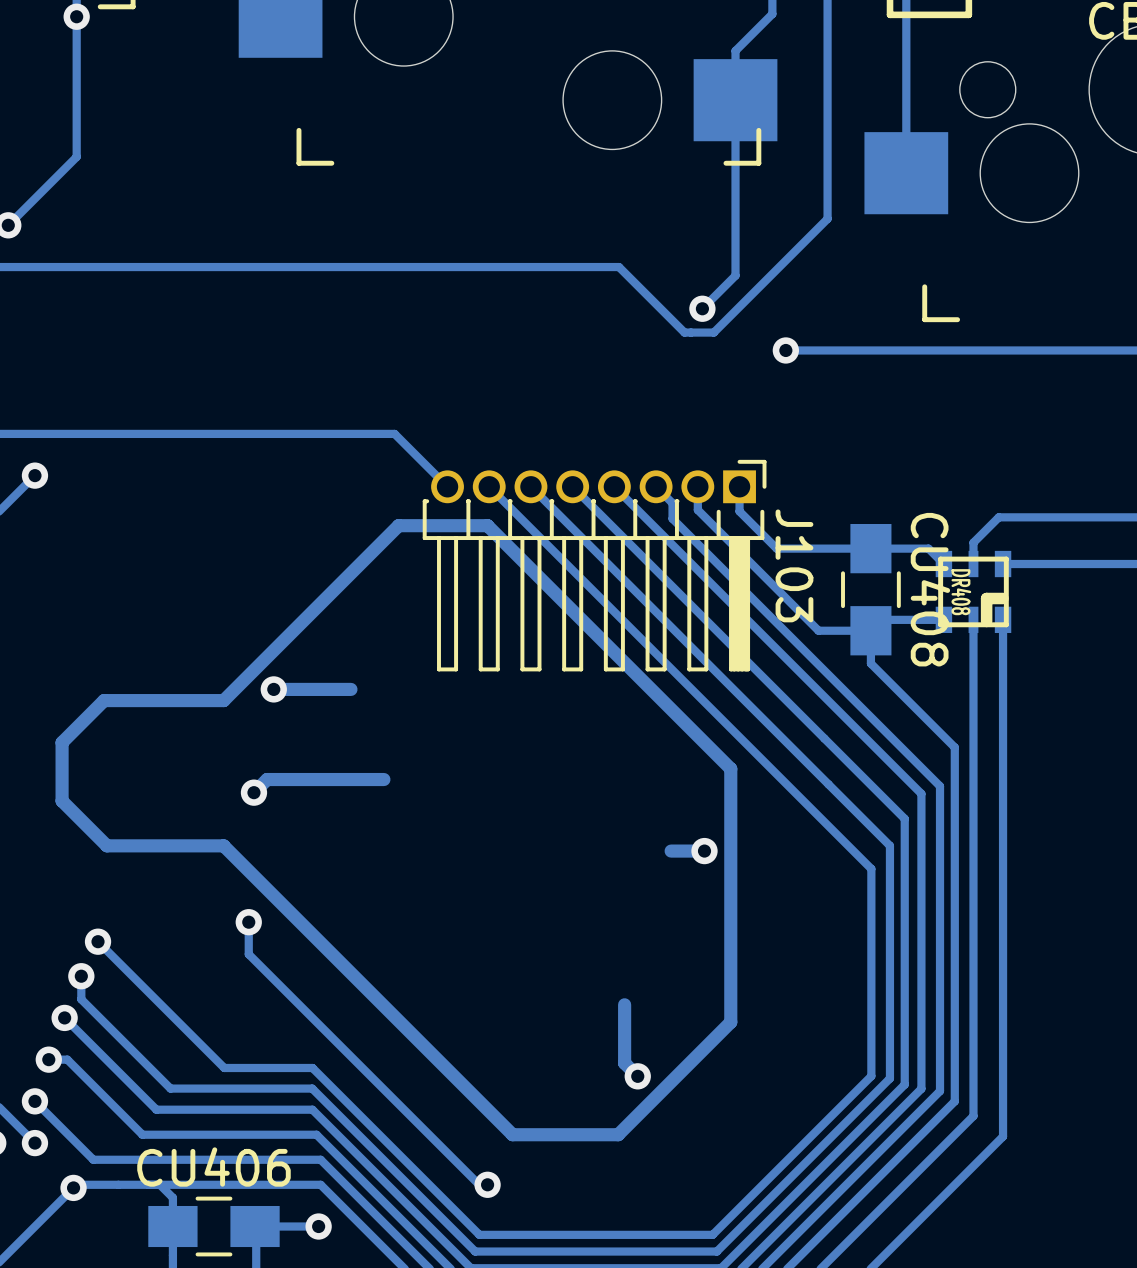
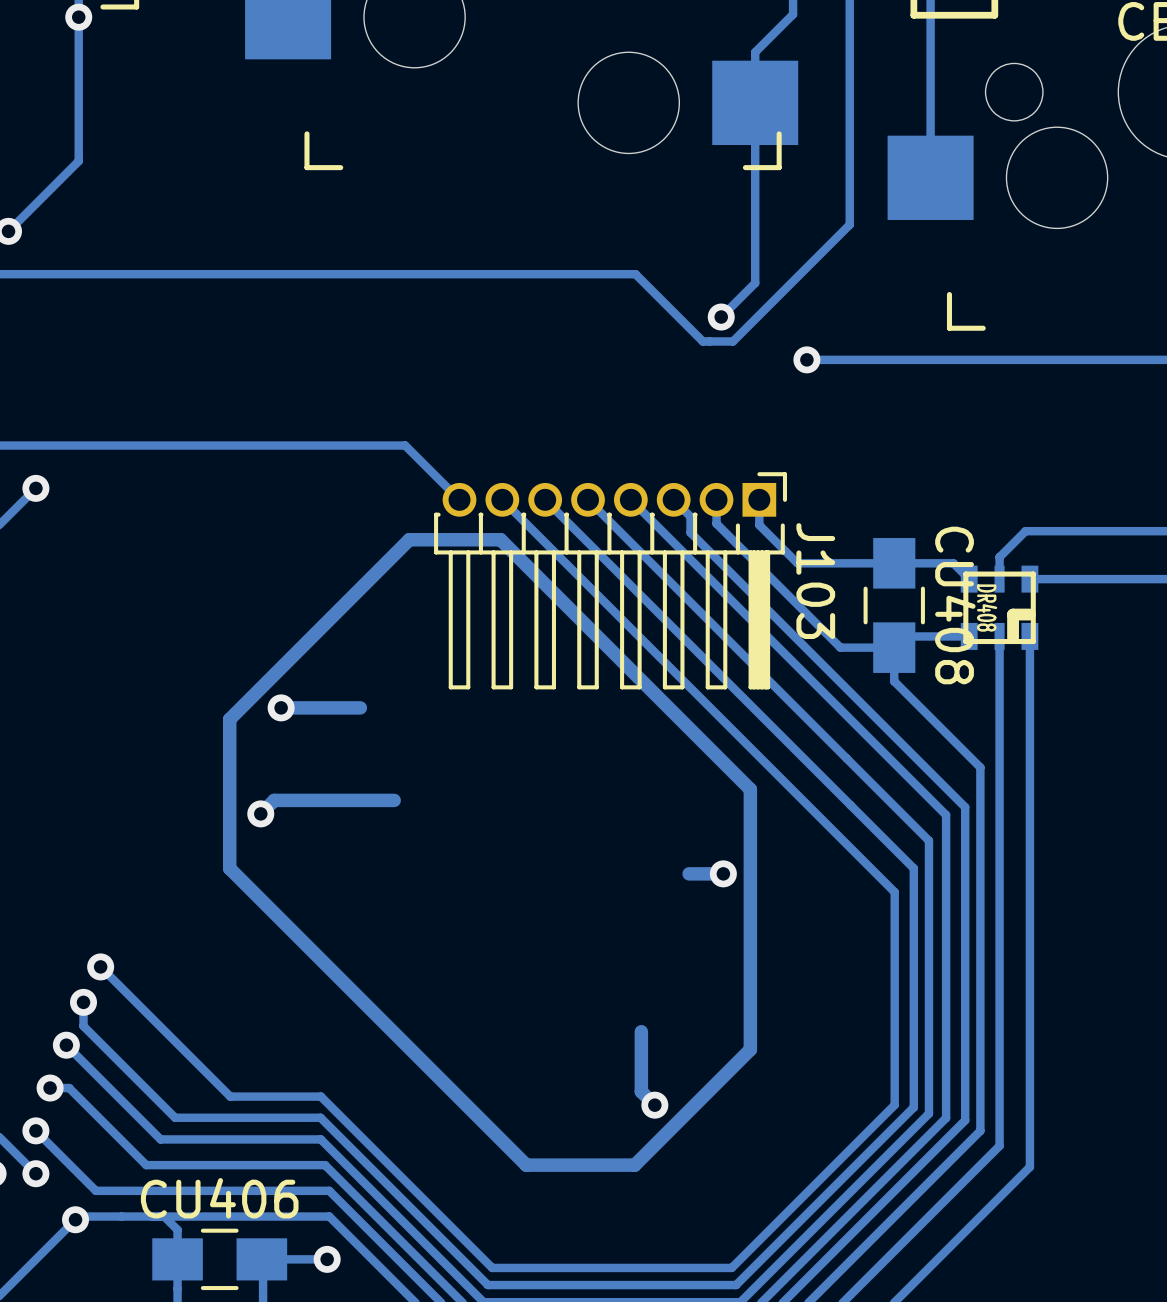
track: (223, 700) (104, 700) (62, 742) (62, 801) (106, 845) (223, 845) -> (229, 719) (229, 868)
track: (248, 922) (248, 954) (479, 1184) (487, 1184) -> none
via: (248, 922) -> none
via: (487, 1184) -> none

